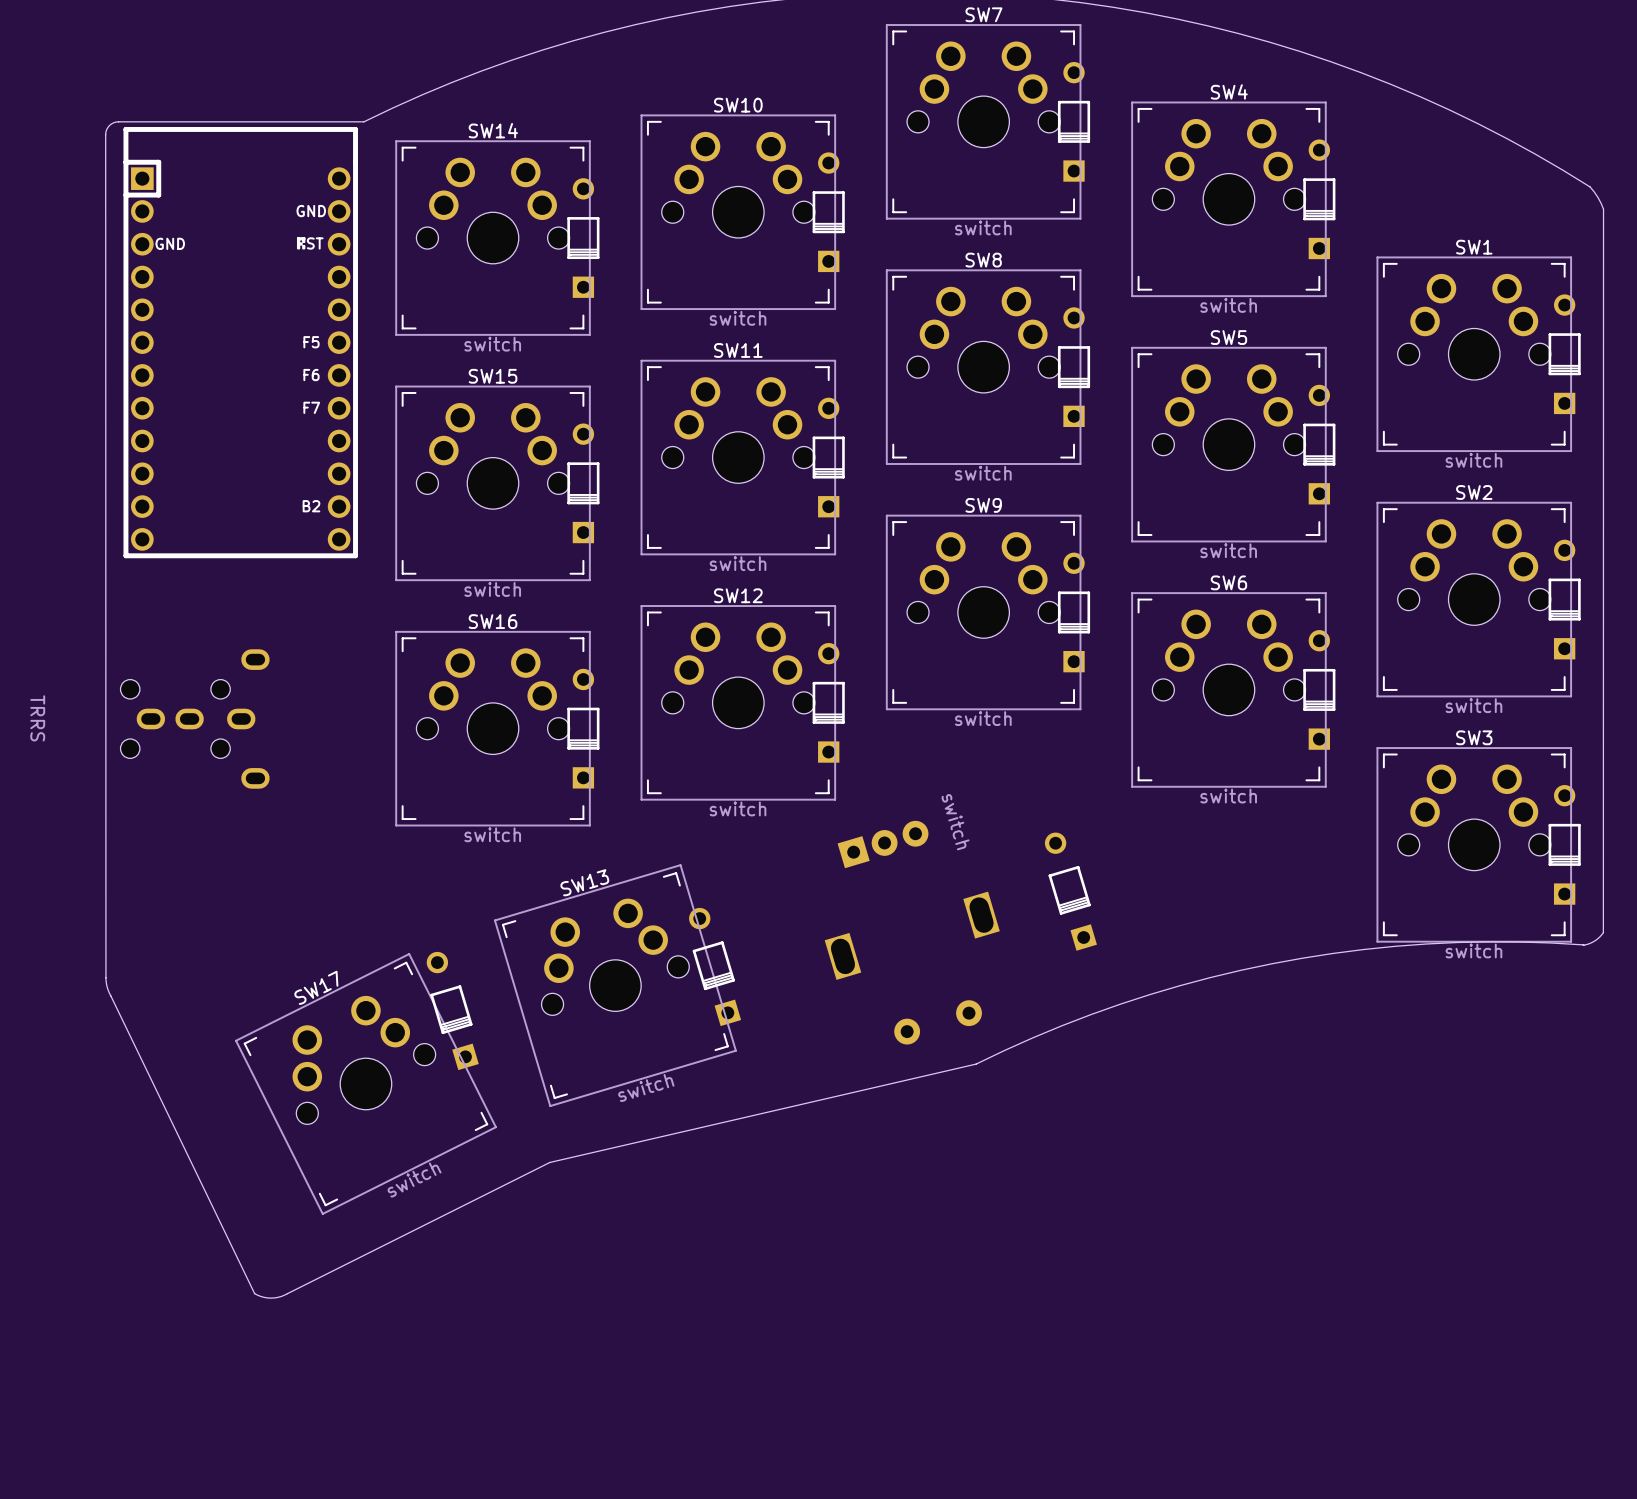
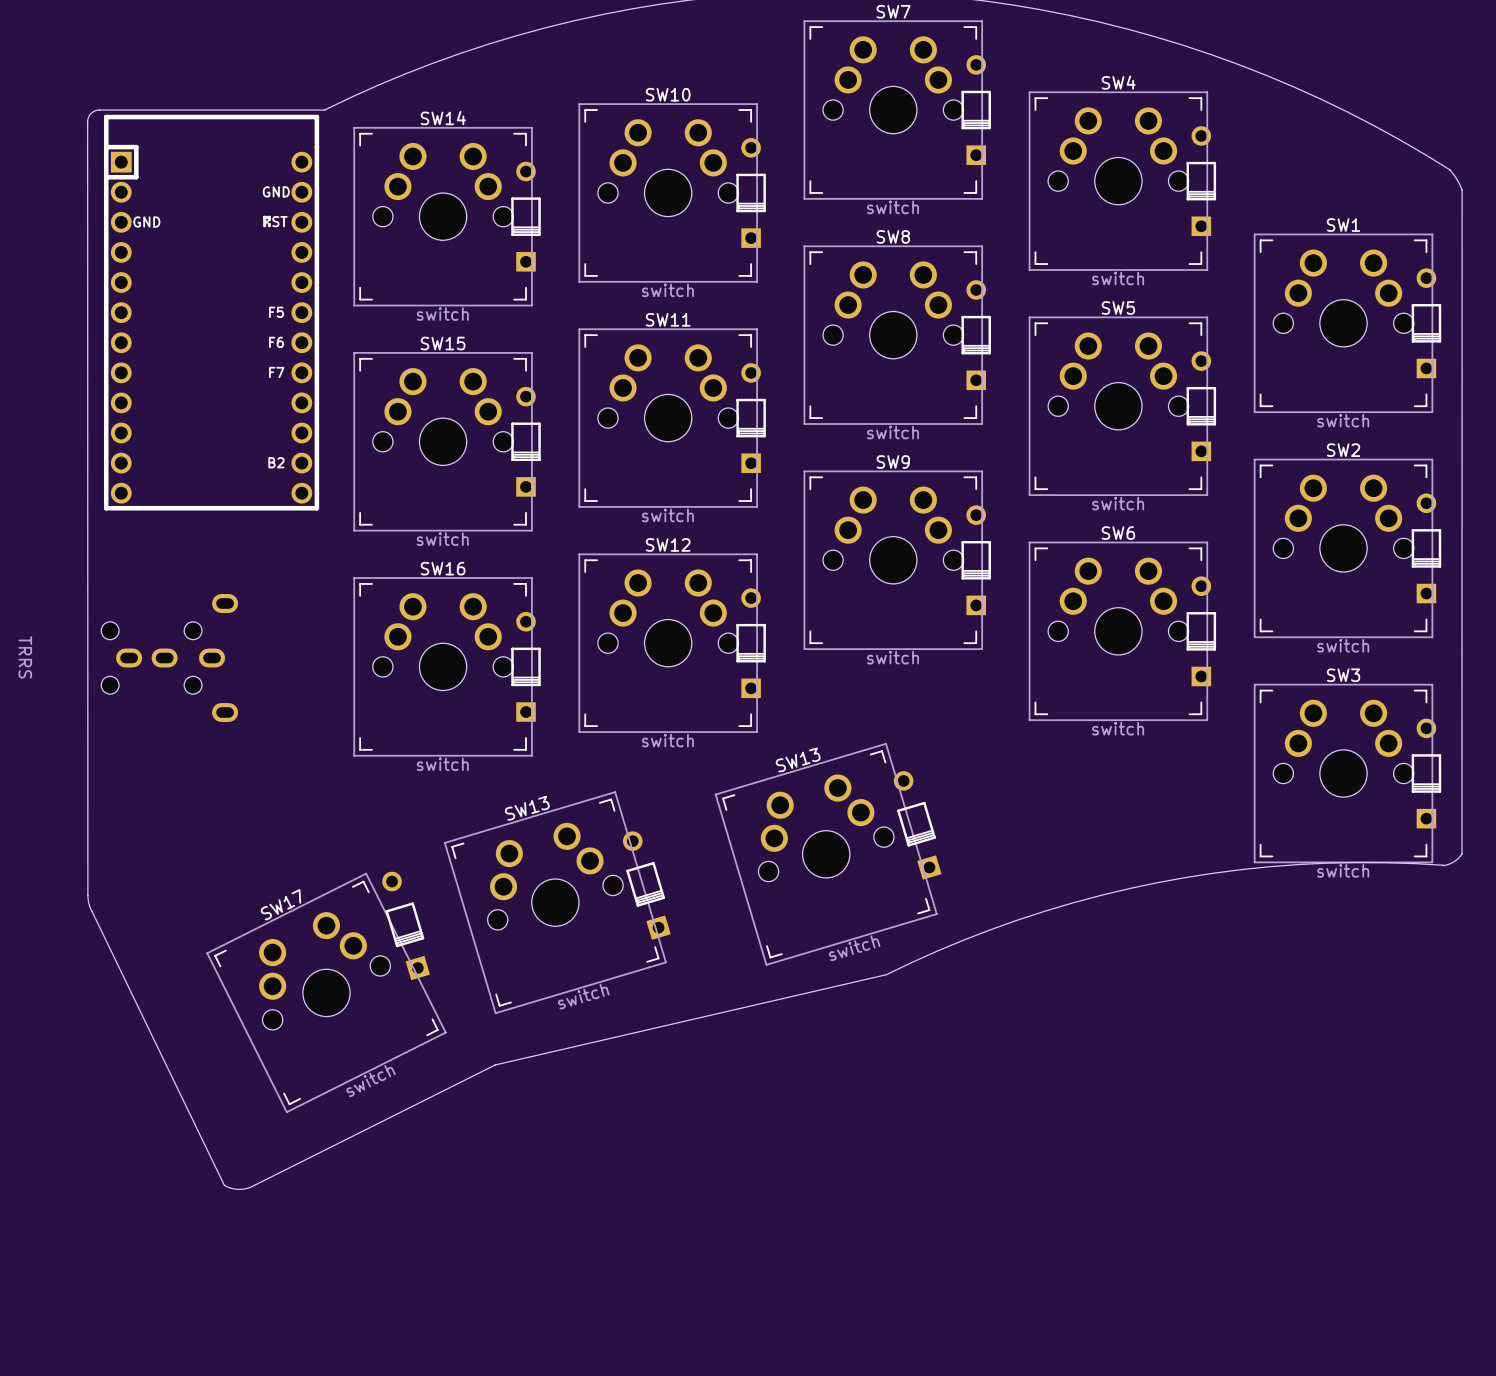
part position: (1070, 891) -> (917, 825)
SW13: none -> switch (826, 854)
part: switch (912, 932) -> none

